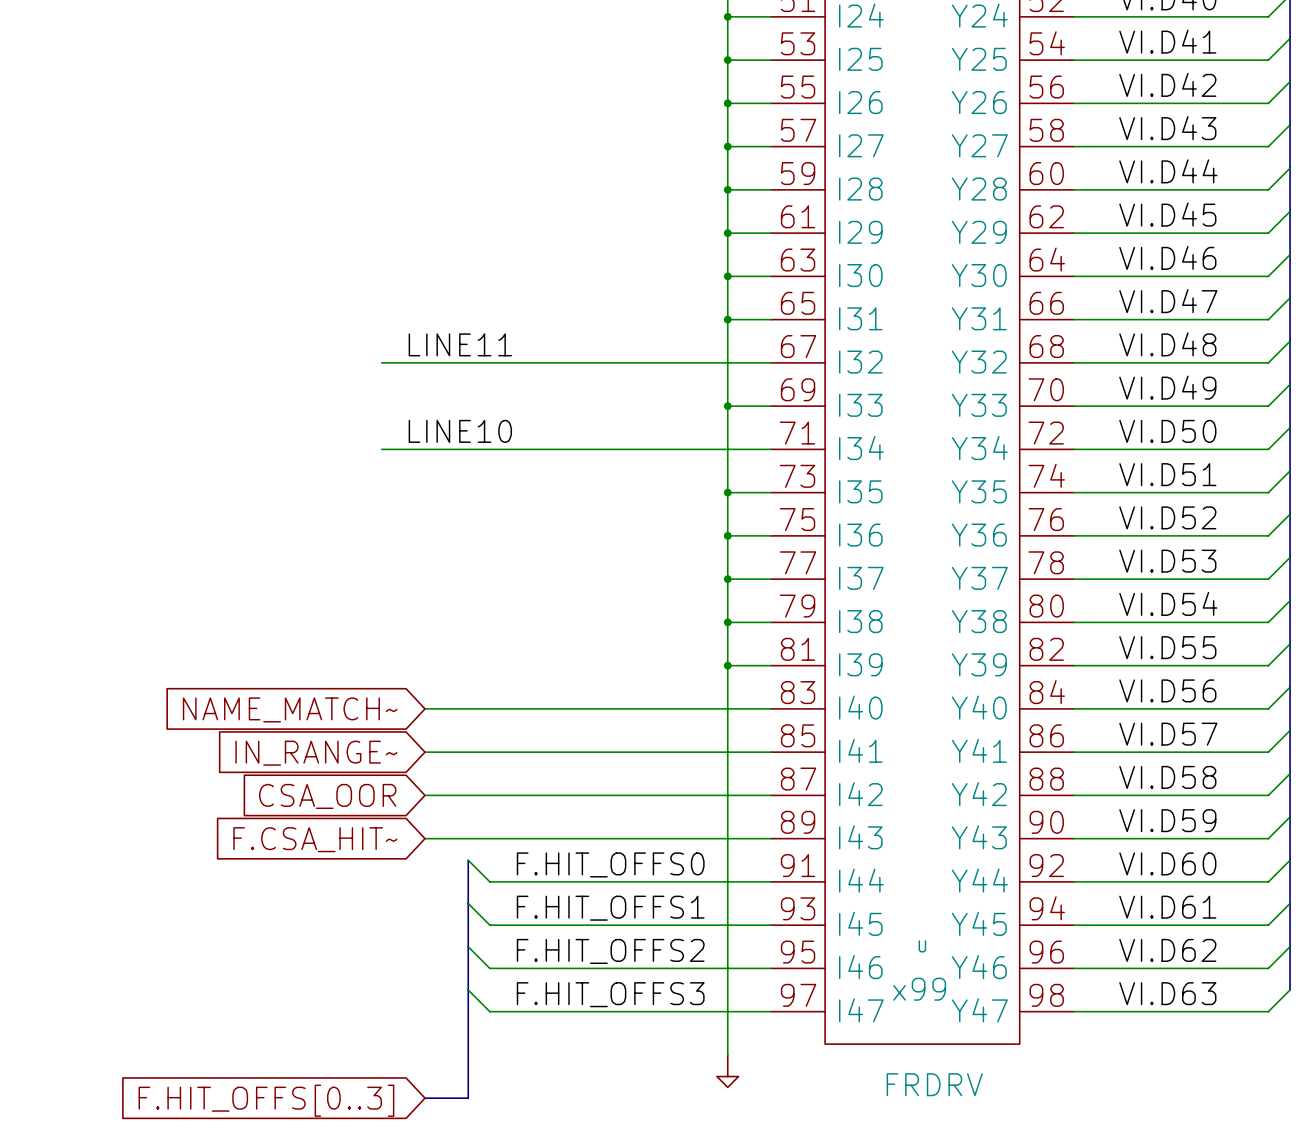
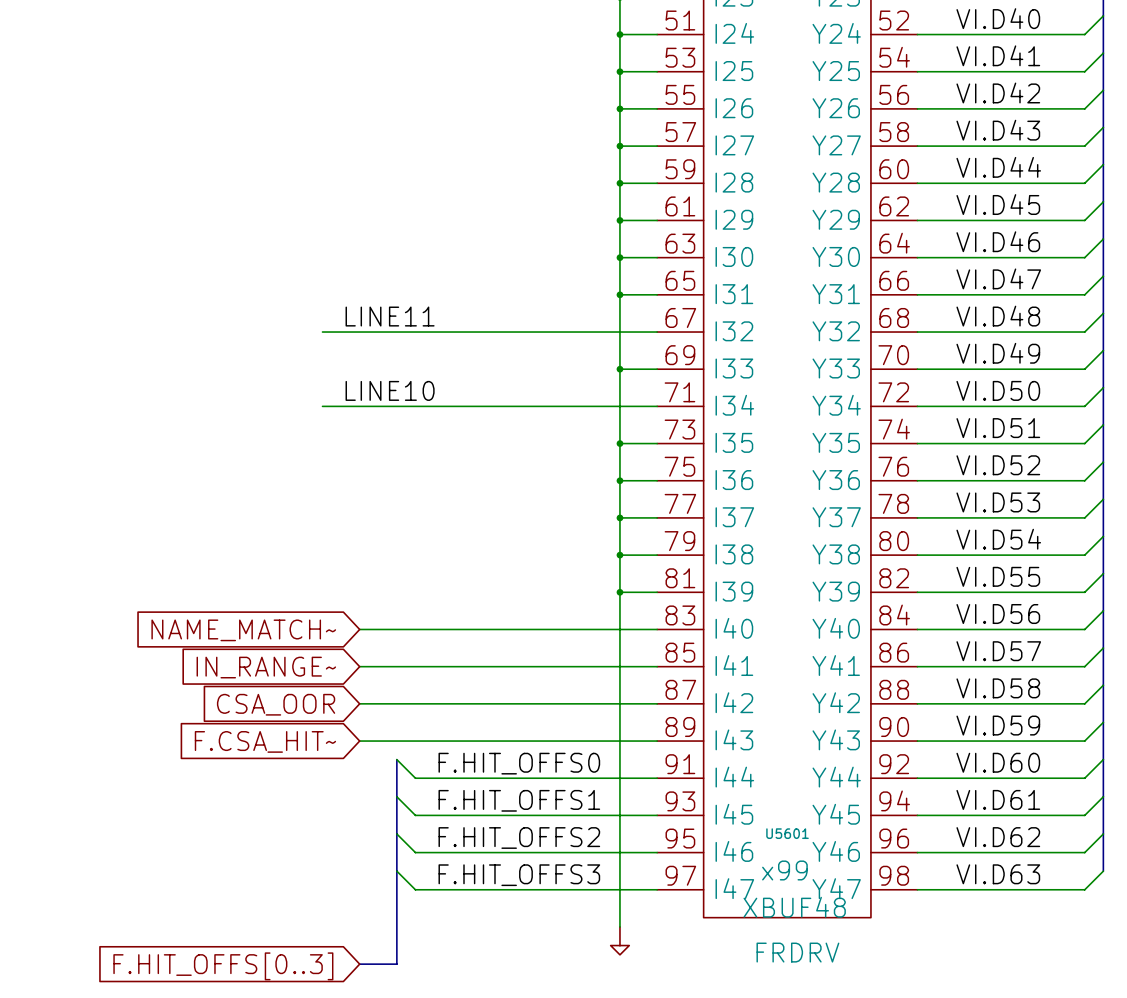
U name: U (922, 946) -> U5601 (787, 833)
U value: none -> XBUF48 (794, 907)

